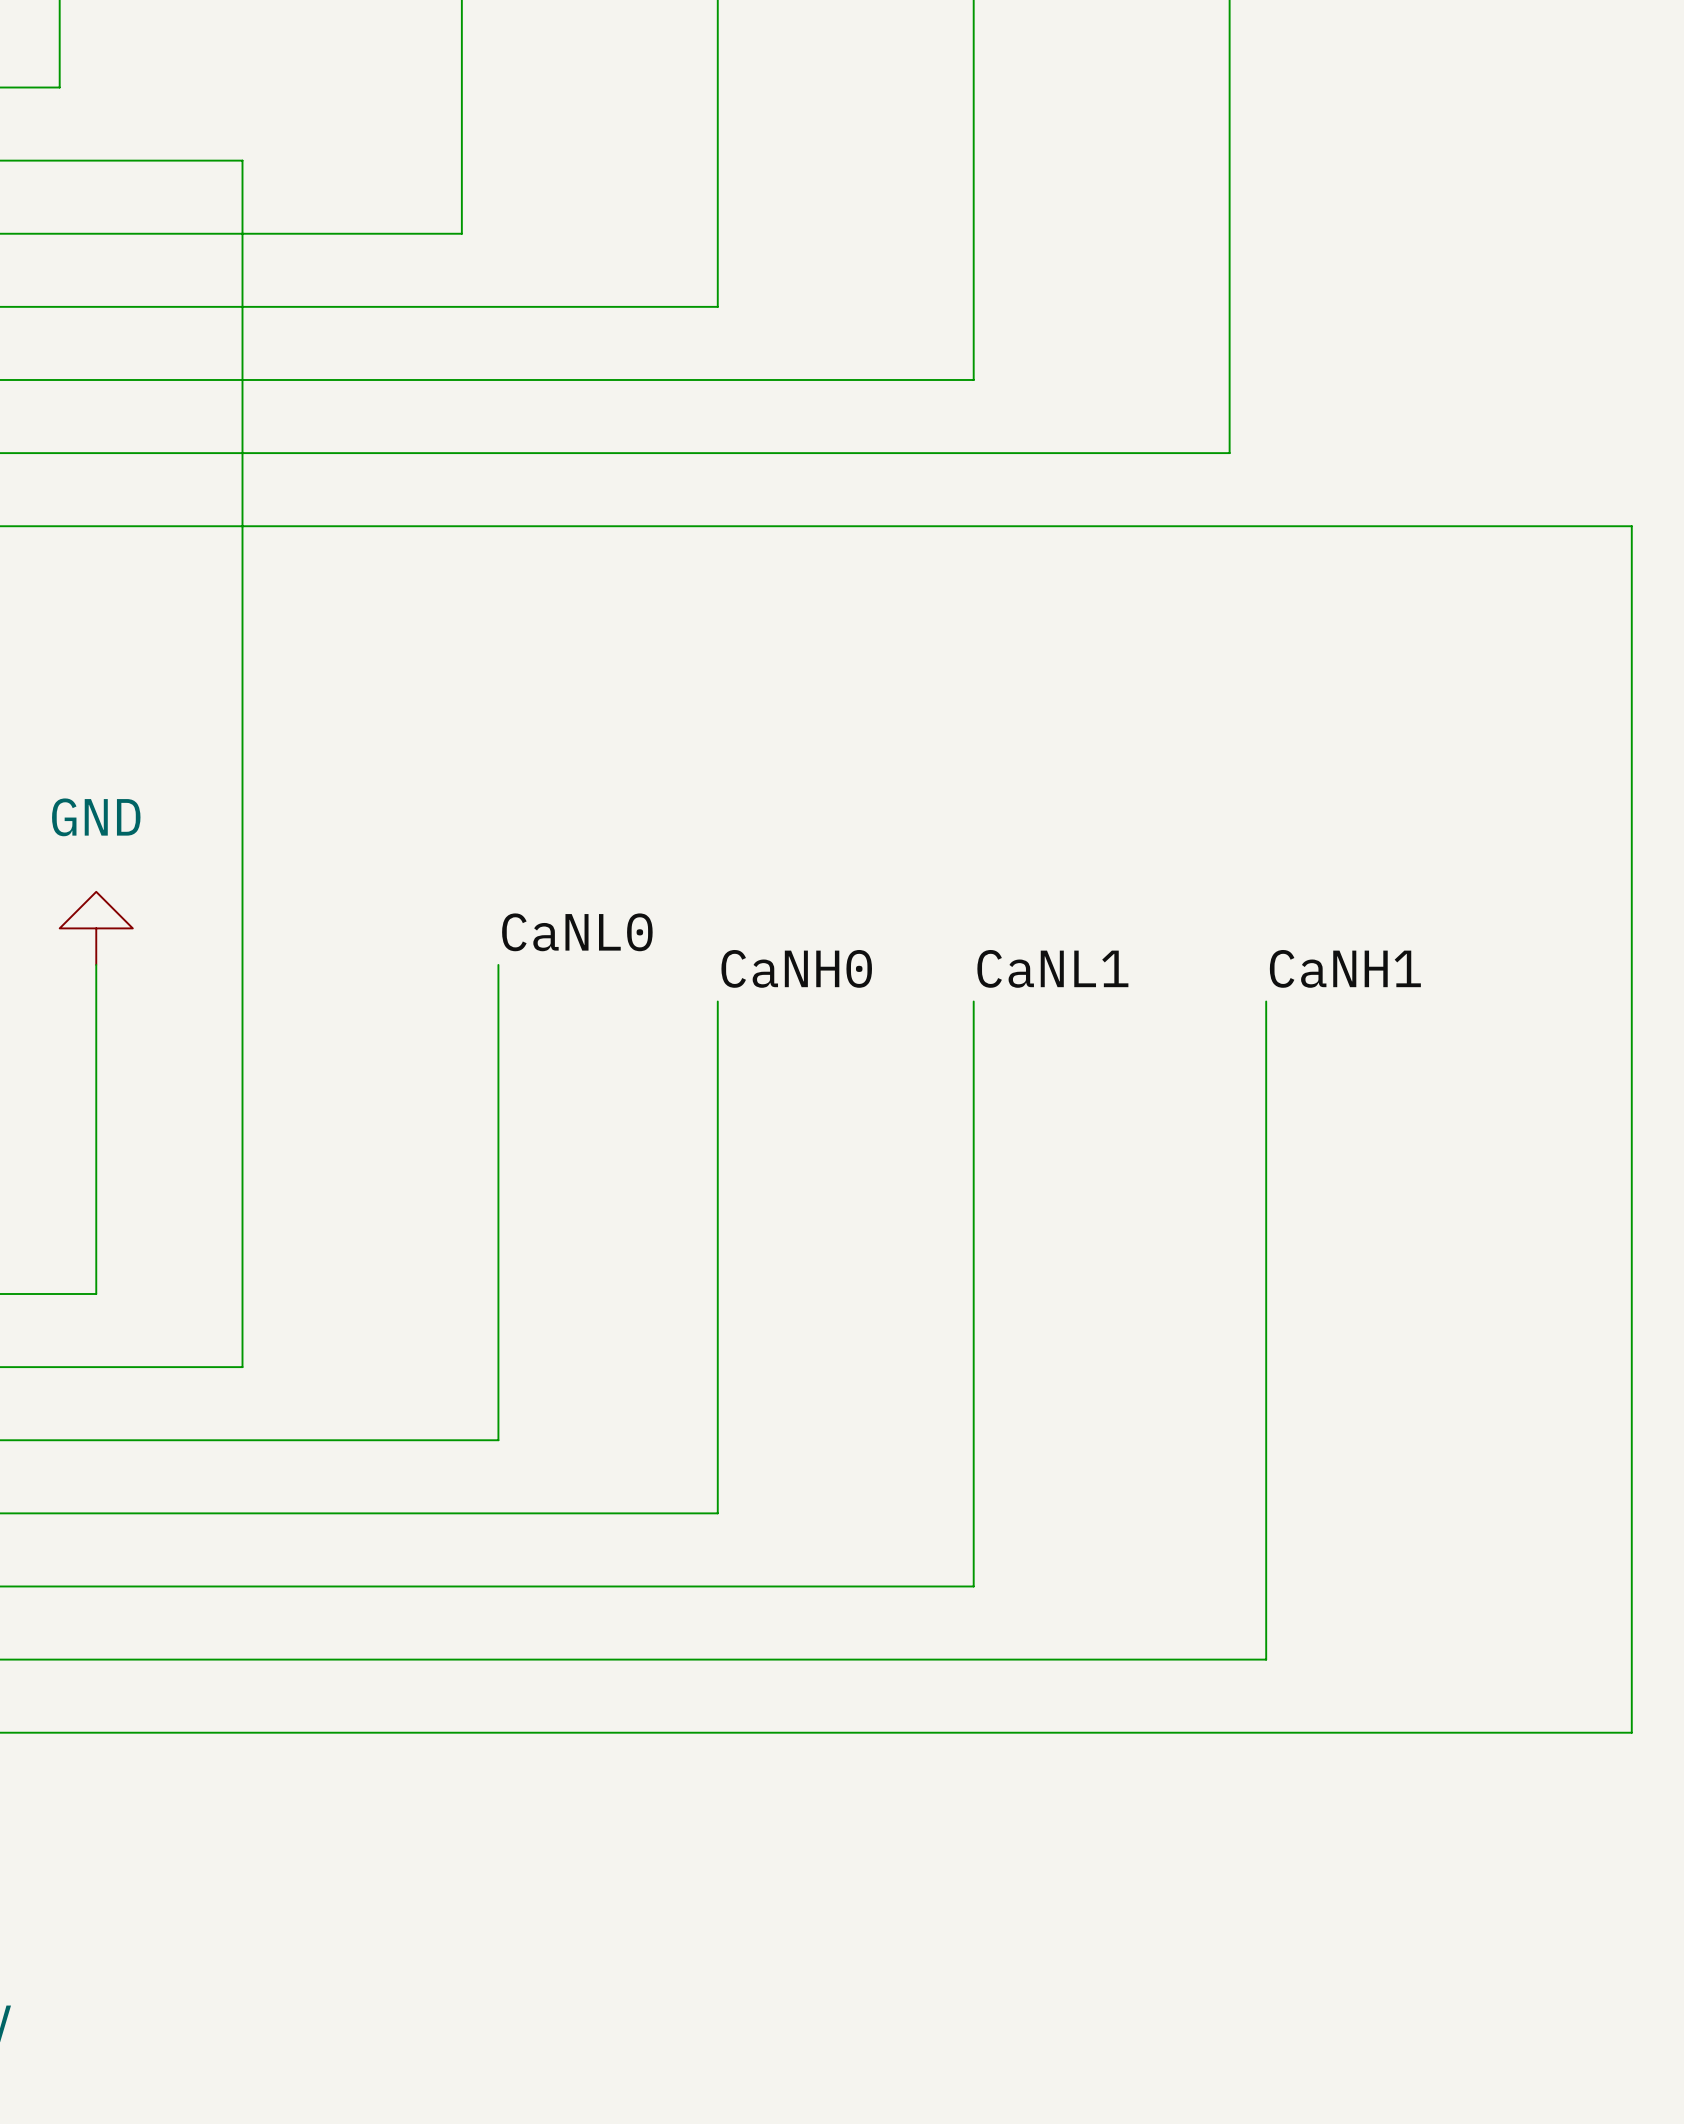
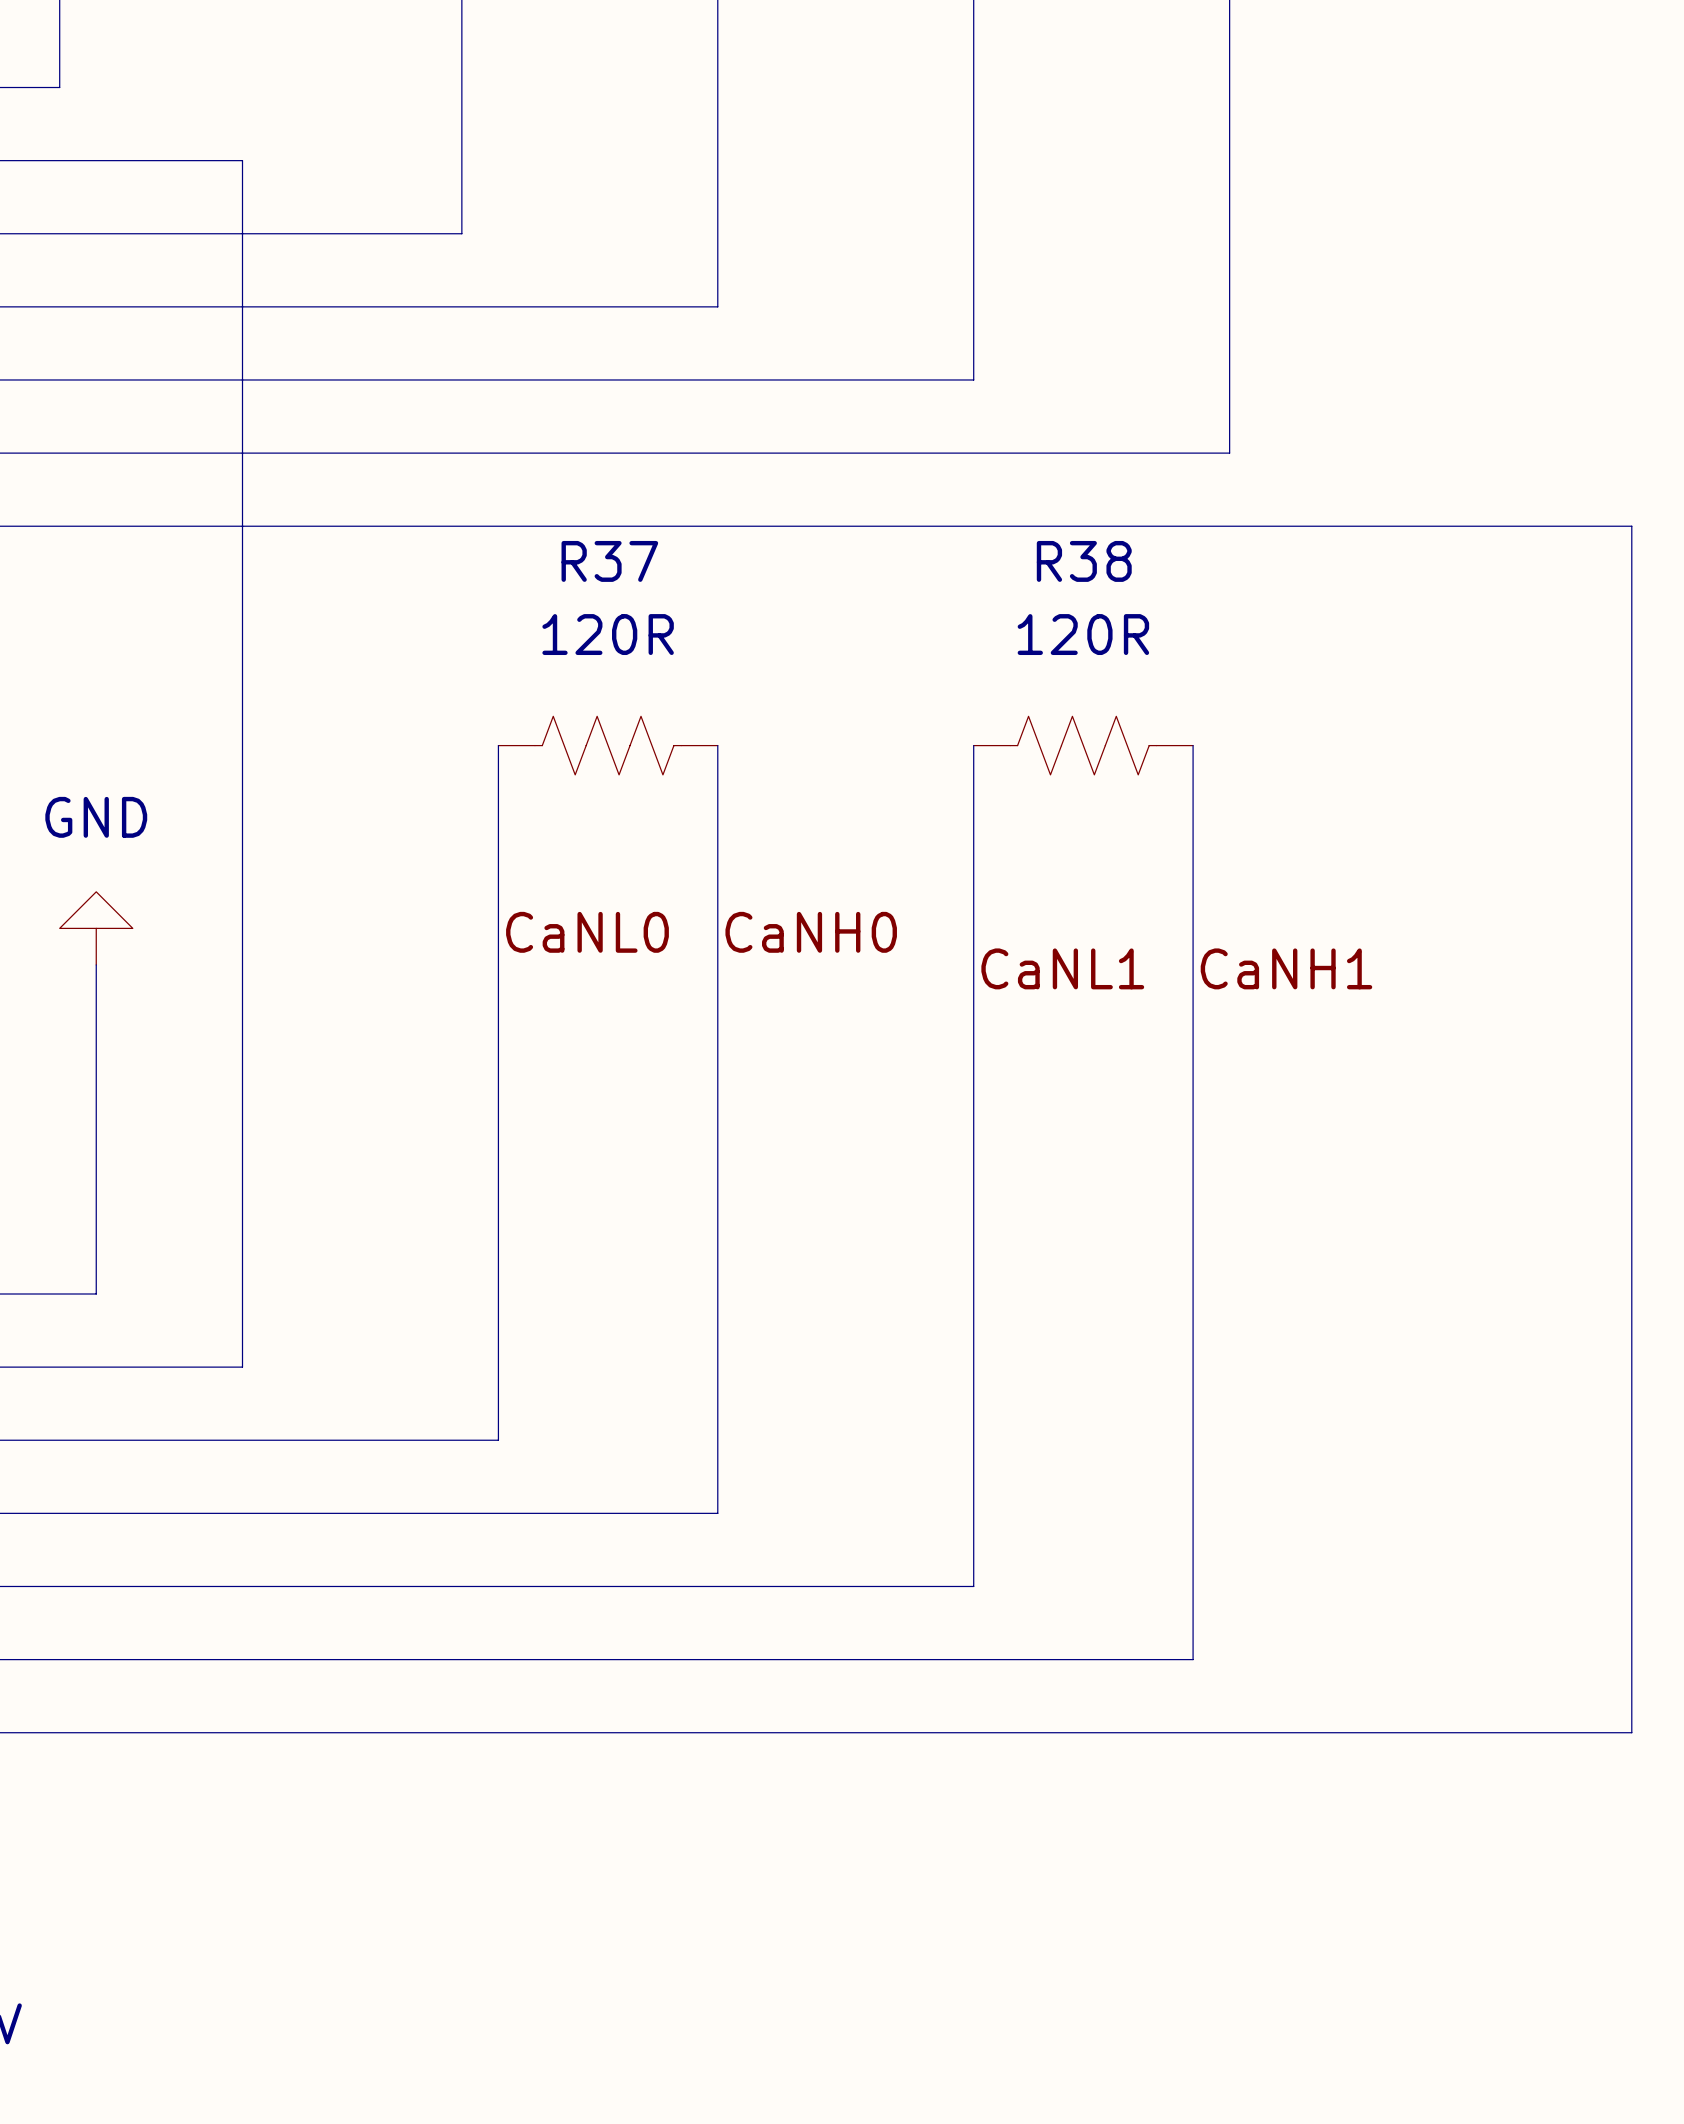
wire: none -> (498, 745) (498, 964)
R37: none -> 120R (608, 745)
wire: none -> (717, 745) (717, 1001)
wire: none -> (973, 745) (973, 1001)
R38: none -> 120R (1083, 745)
label position: CaNH0 (796, 968) -> CaNH0 (811, 932)
label position: CaNH1 (1345, 968) -> CaNH1 (1286, 968)
wire: (1266, 1001) (1266, 1659) (1193, 1659) -> (1193, 745) (1193, 1659)

